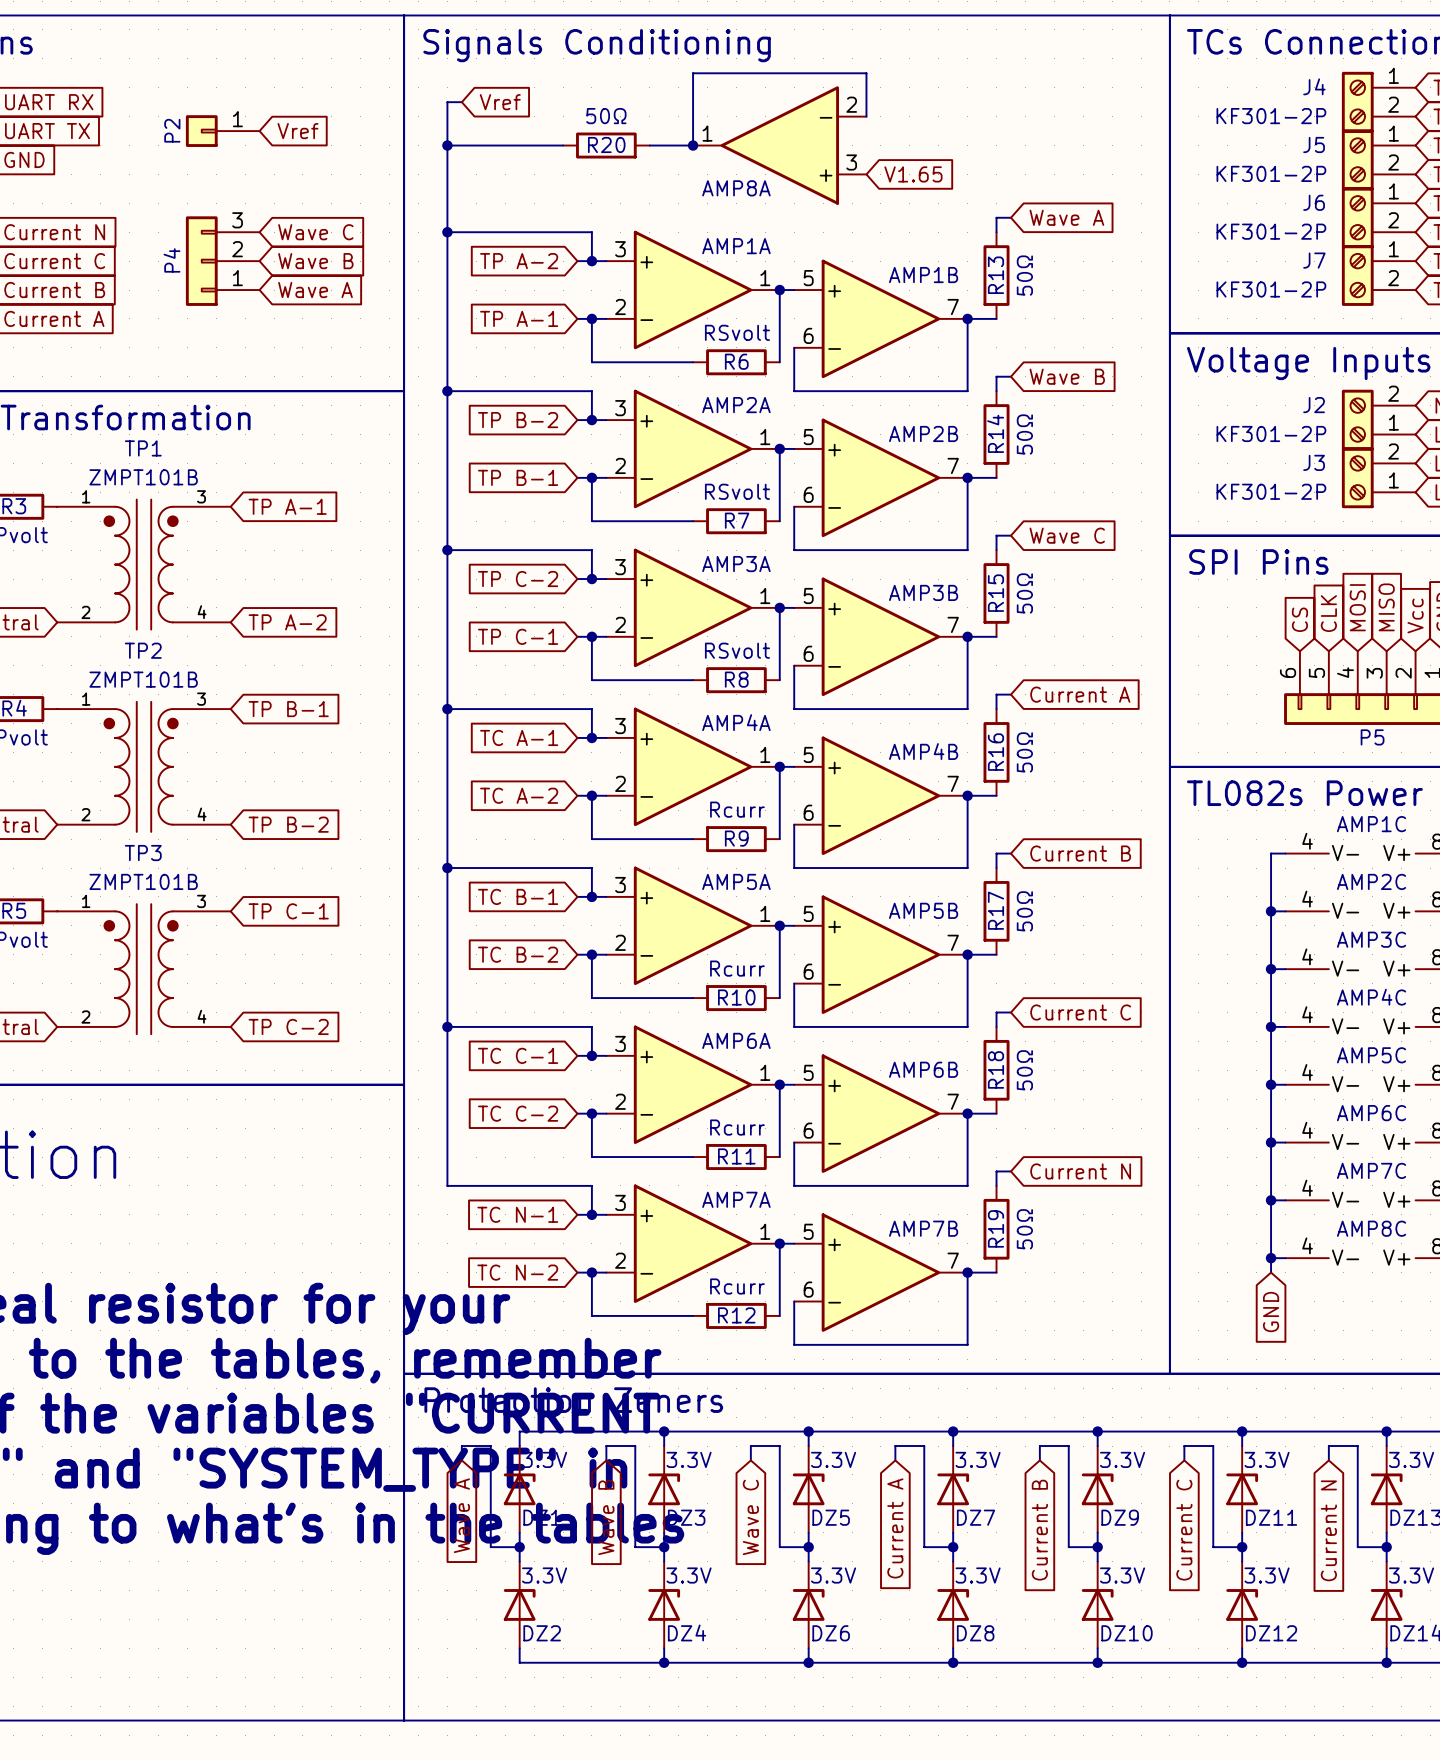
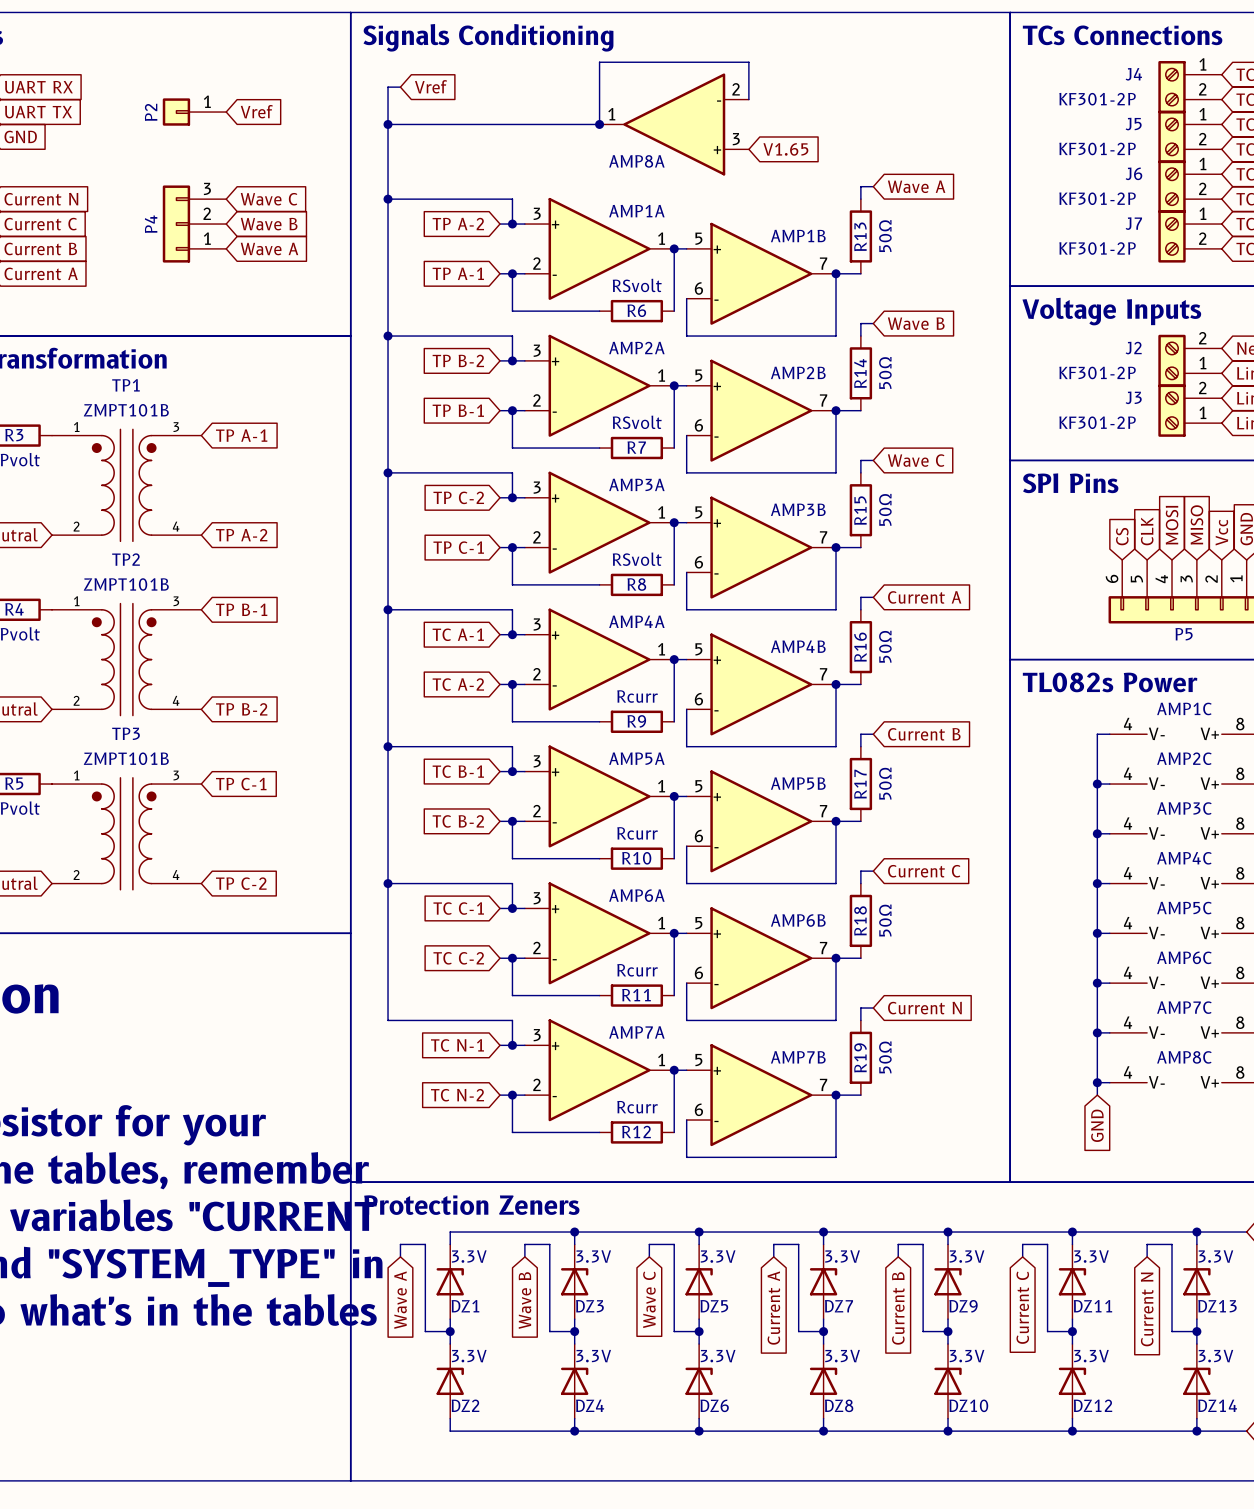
wire: none -> (487, 124) (562, 124)
R20: 50Ω (606, 145) -> none

